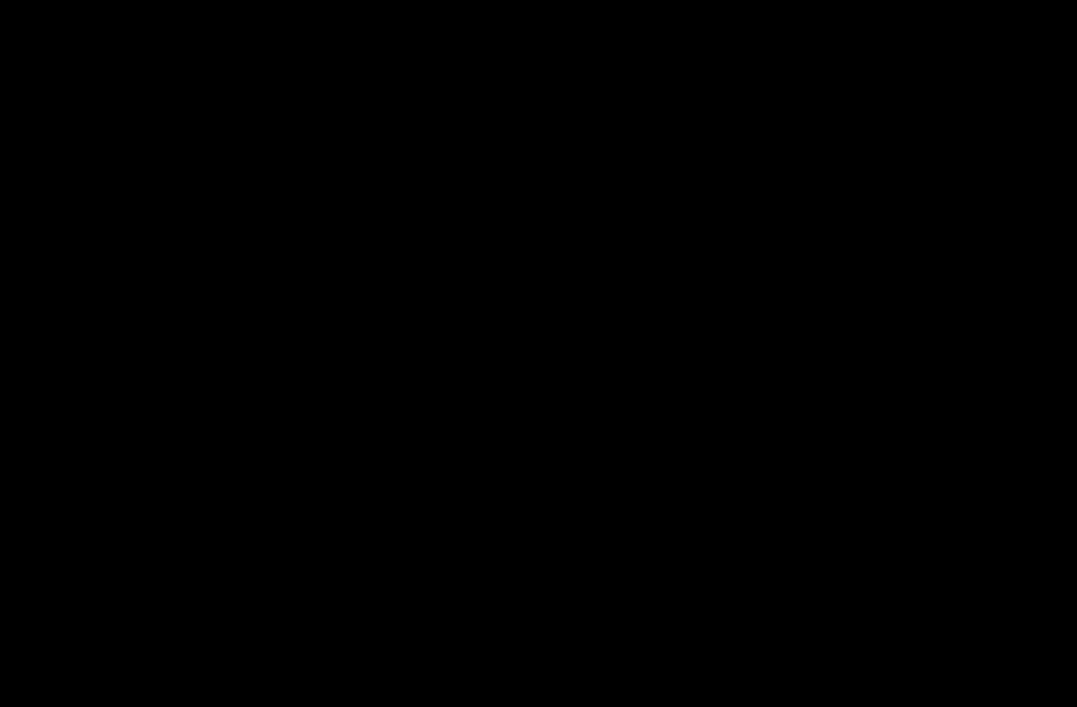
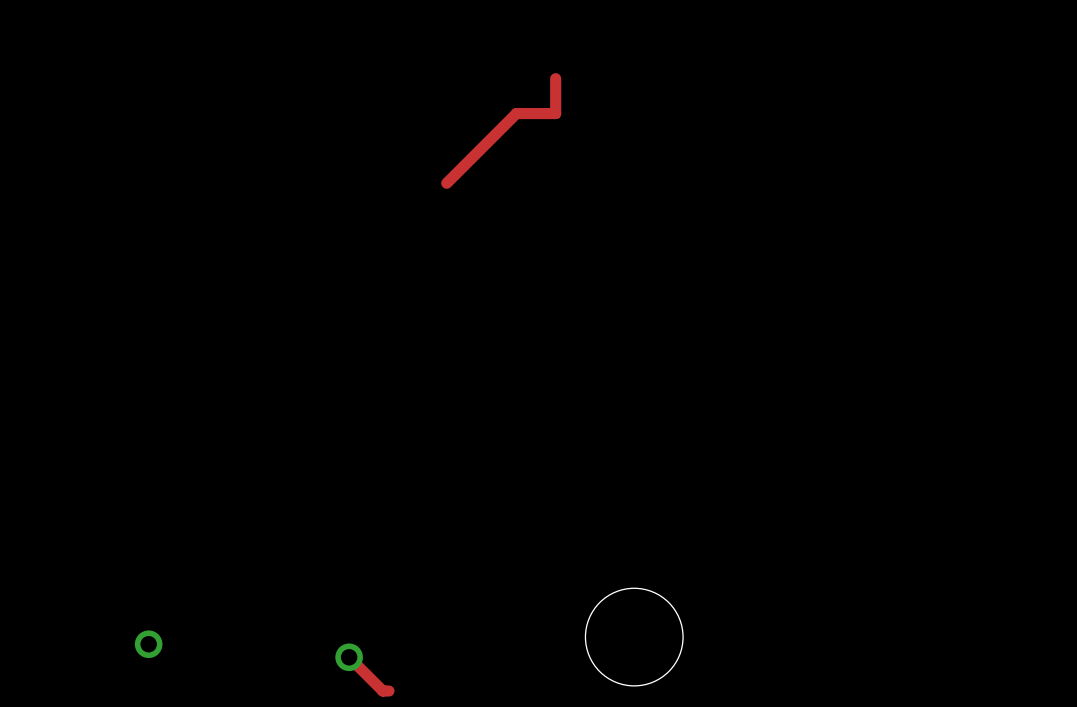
top track: none -> (555, 78) (555, 113) (516, 113) (446, 183)
drawing: none -> [585, 587, 684, 687]
via: none -> (148, 644)
top track: none -> (349, 657) (382, 691) (388, 691)
via: none -> (349, 657)

